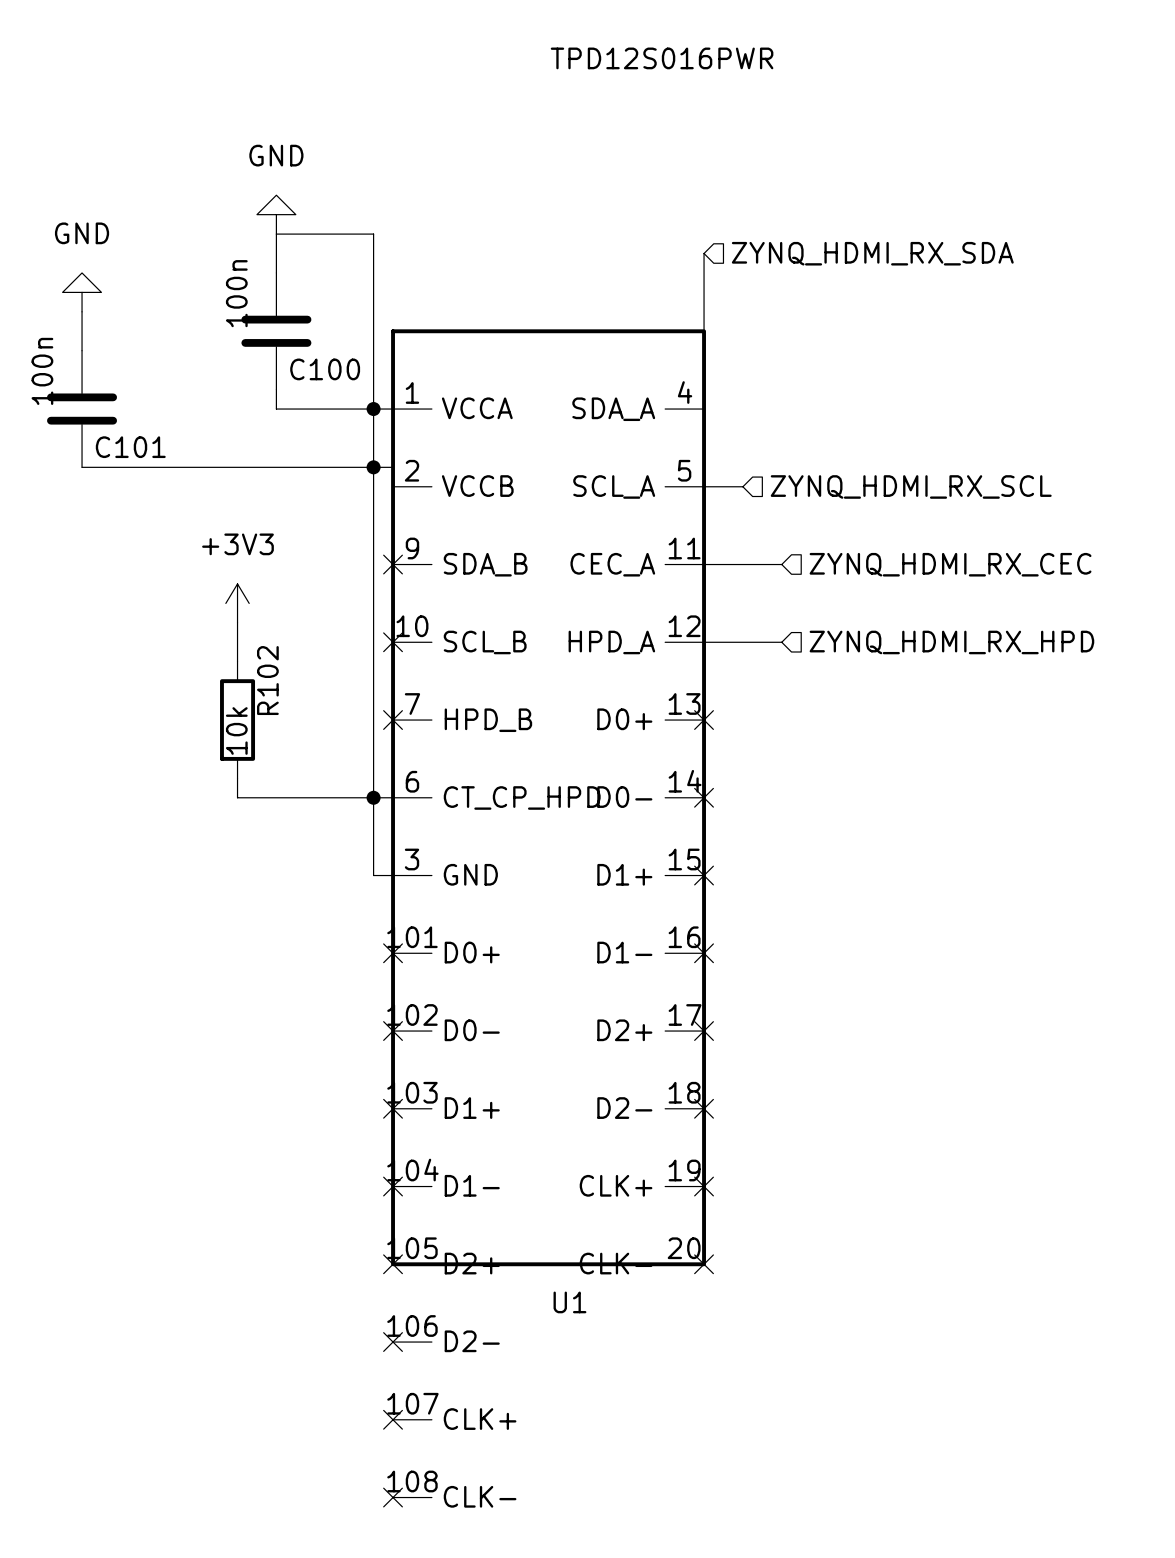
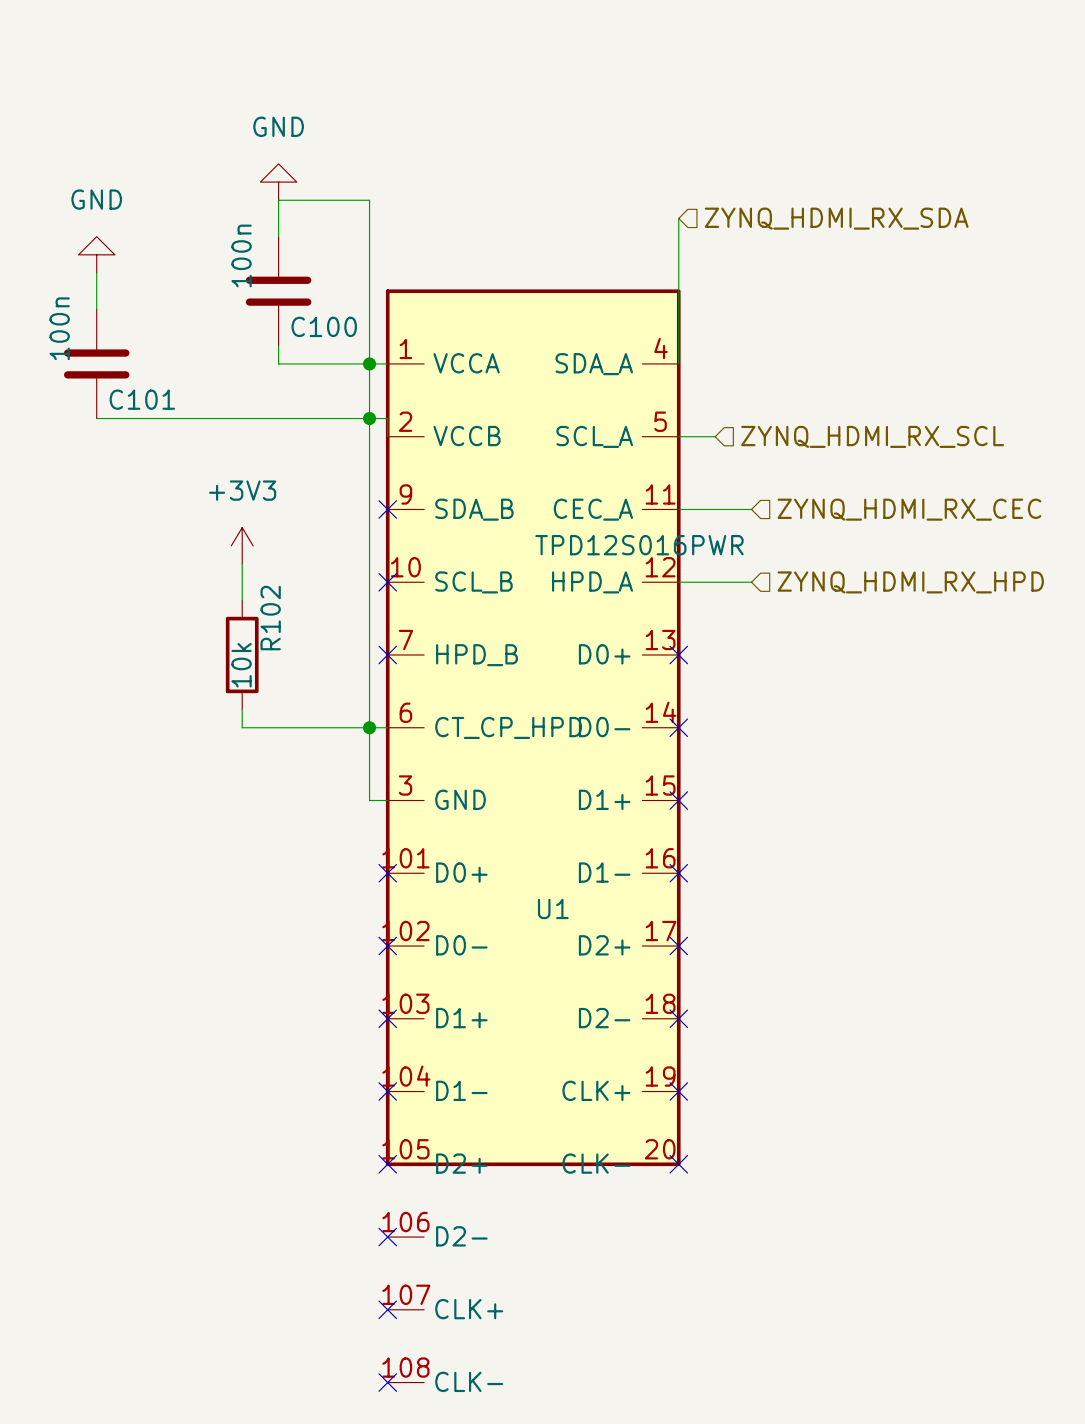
U1 value position: TPD12S016PWR (662, 58) -> TPD12S016PWR (639, 545)
U1 name position: U1 (569, 1302) -> U1 (553, 908)

